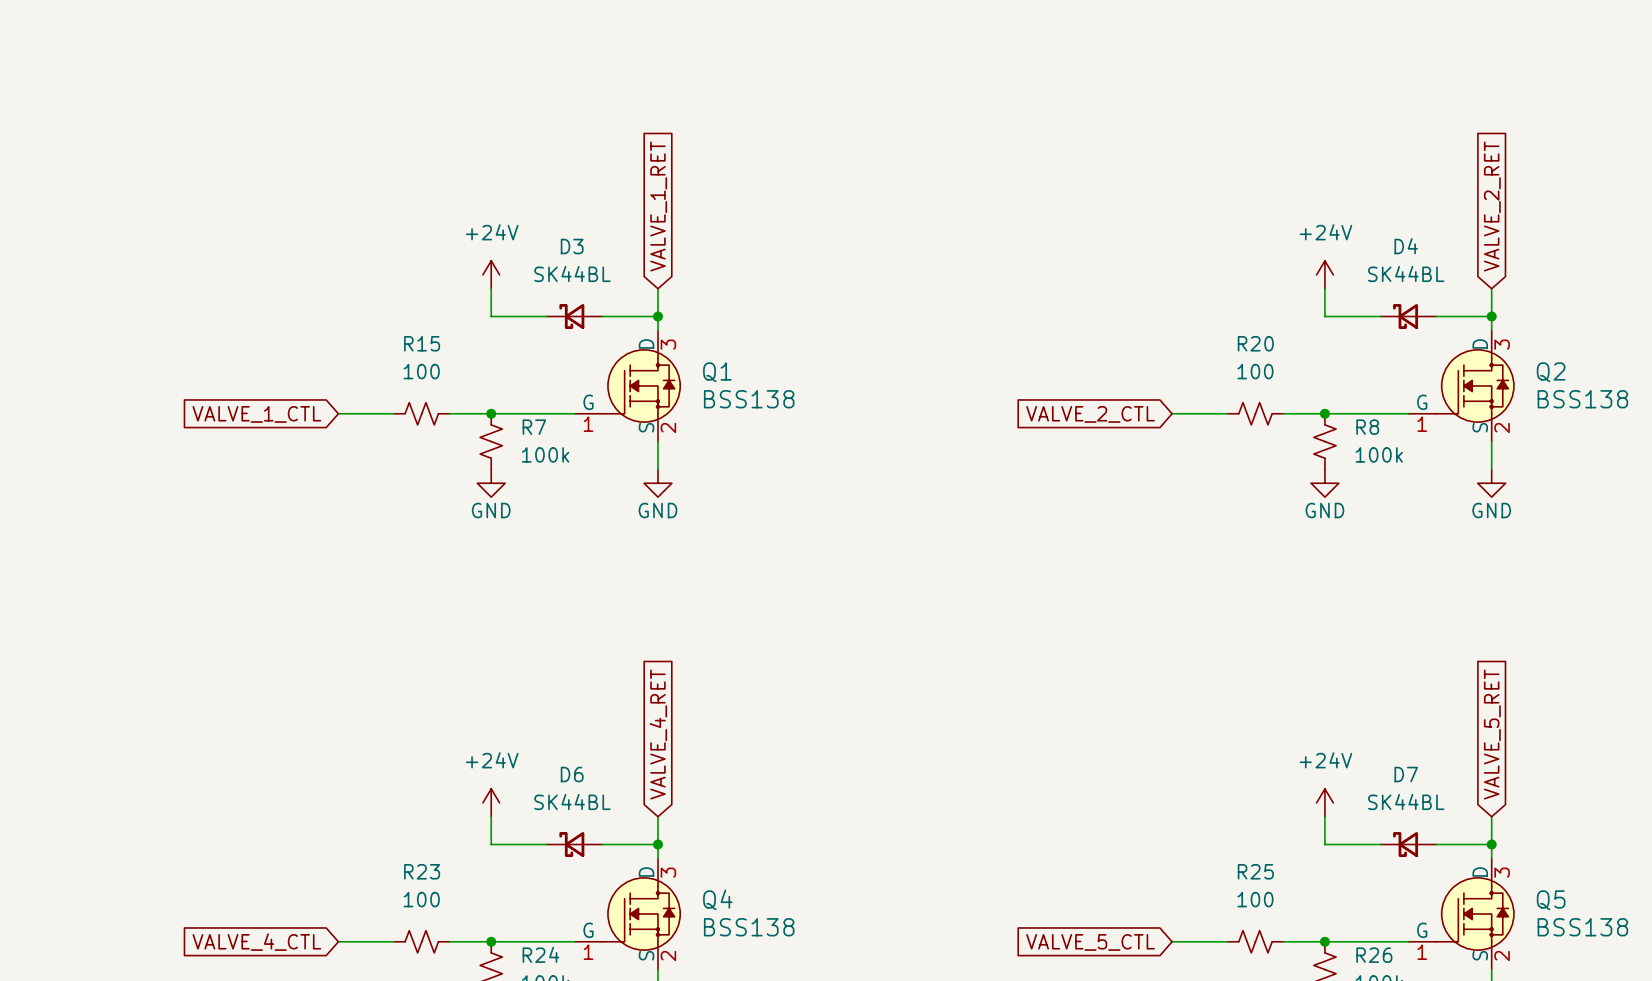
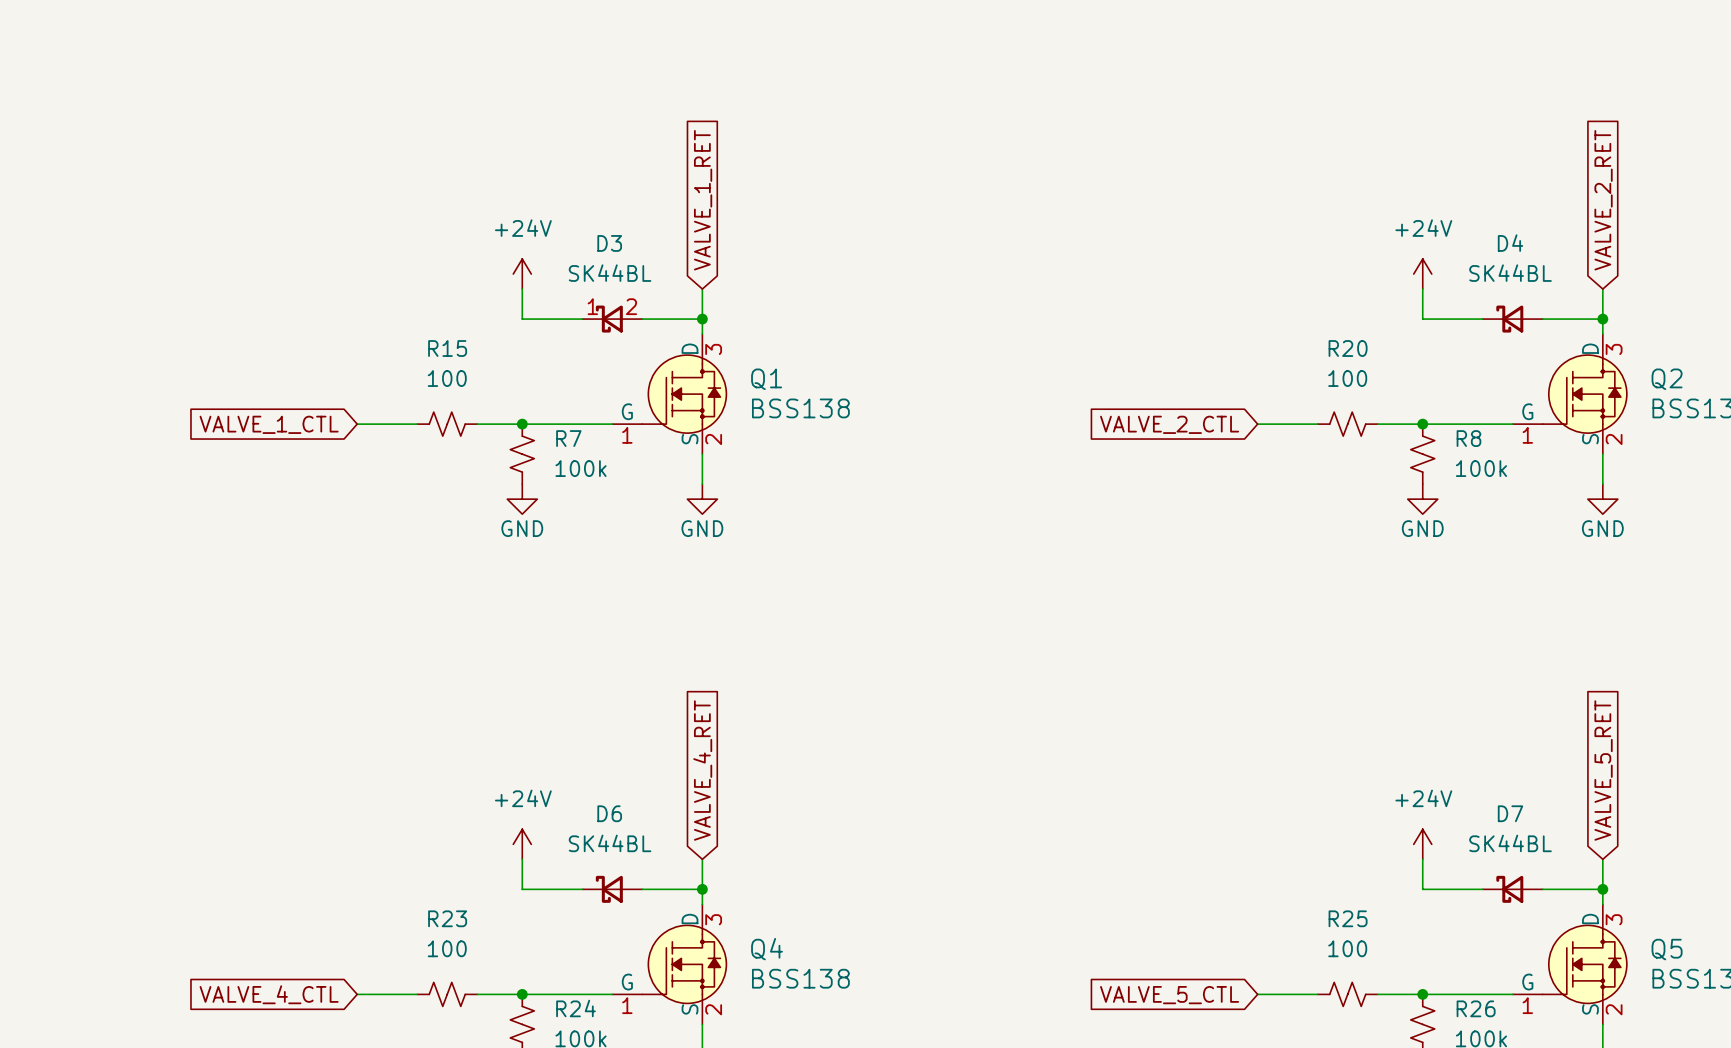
D3 pin number: none -> 1 (592, 306)
D3 pin number: none -> 2 (631, 306)

